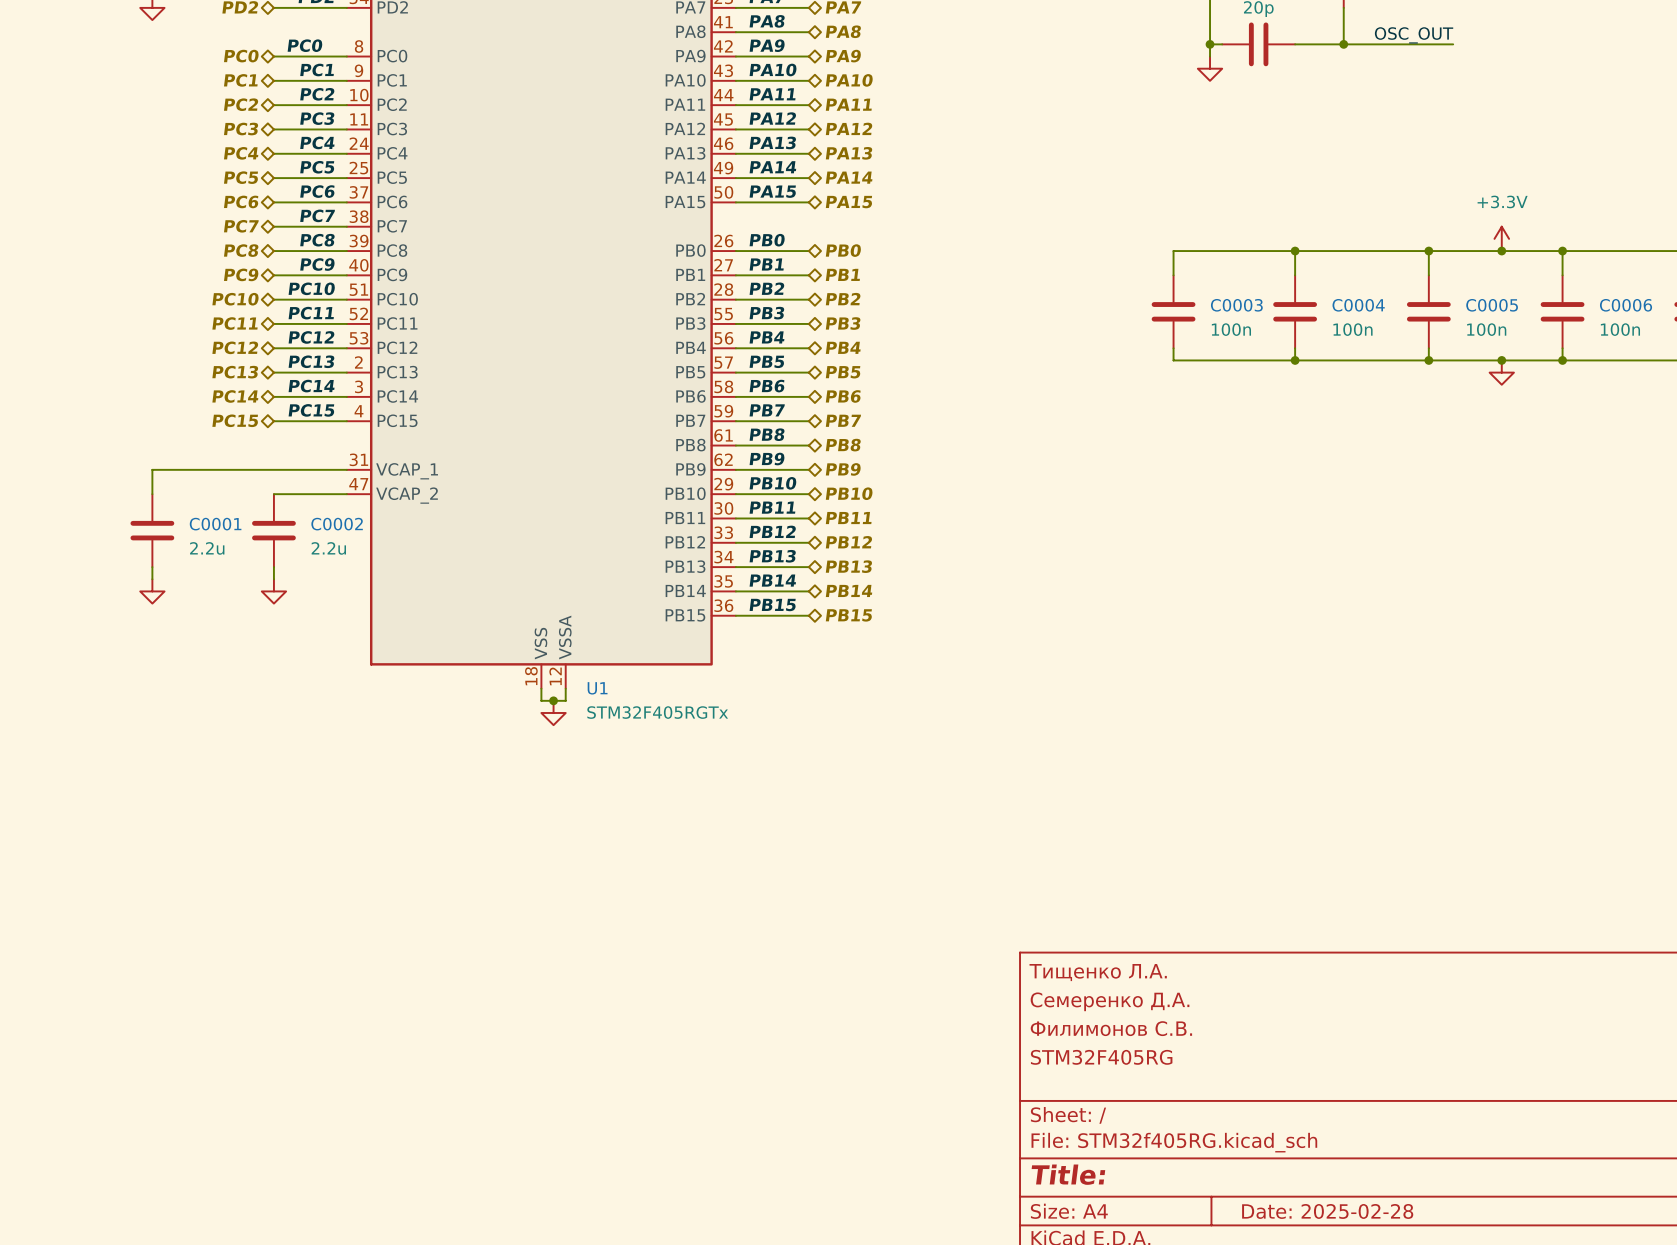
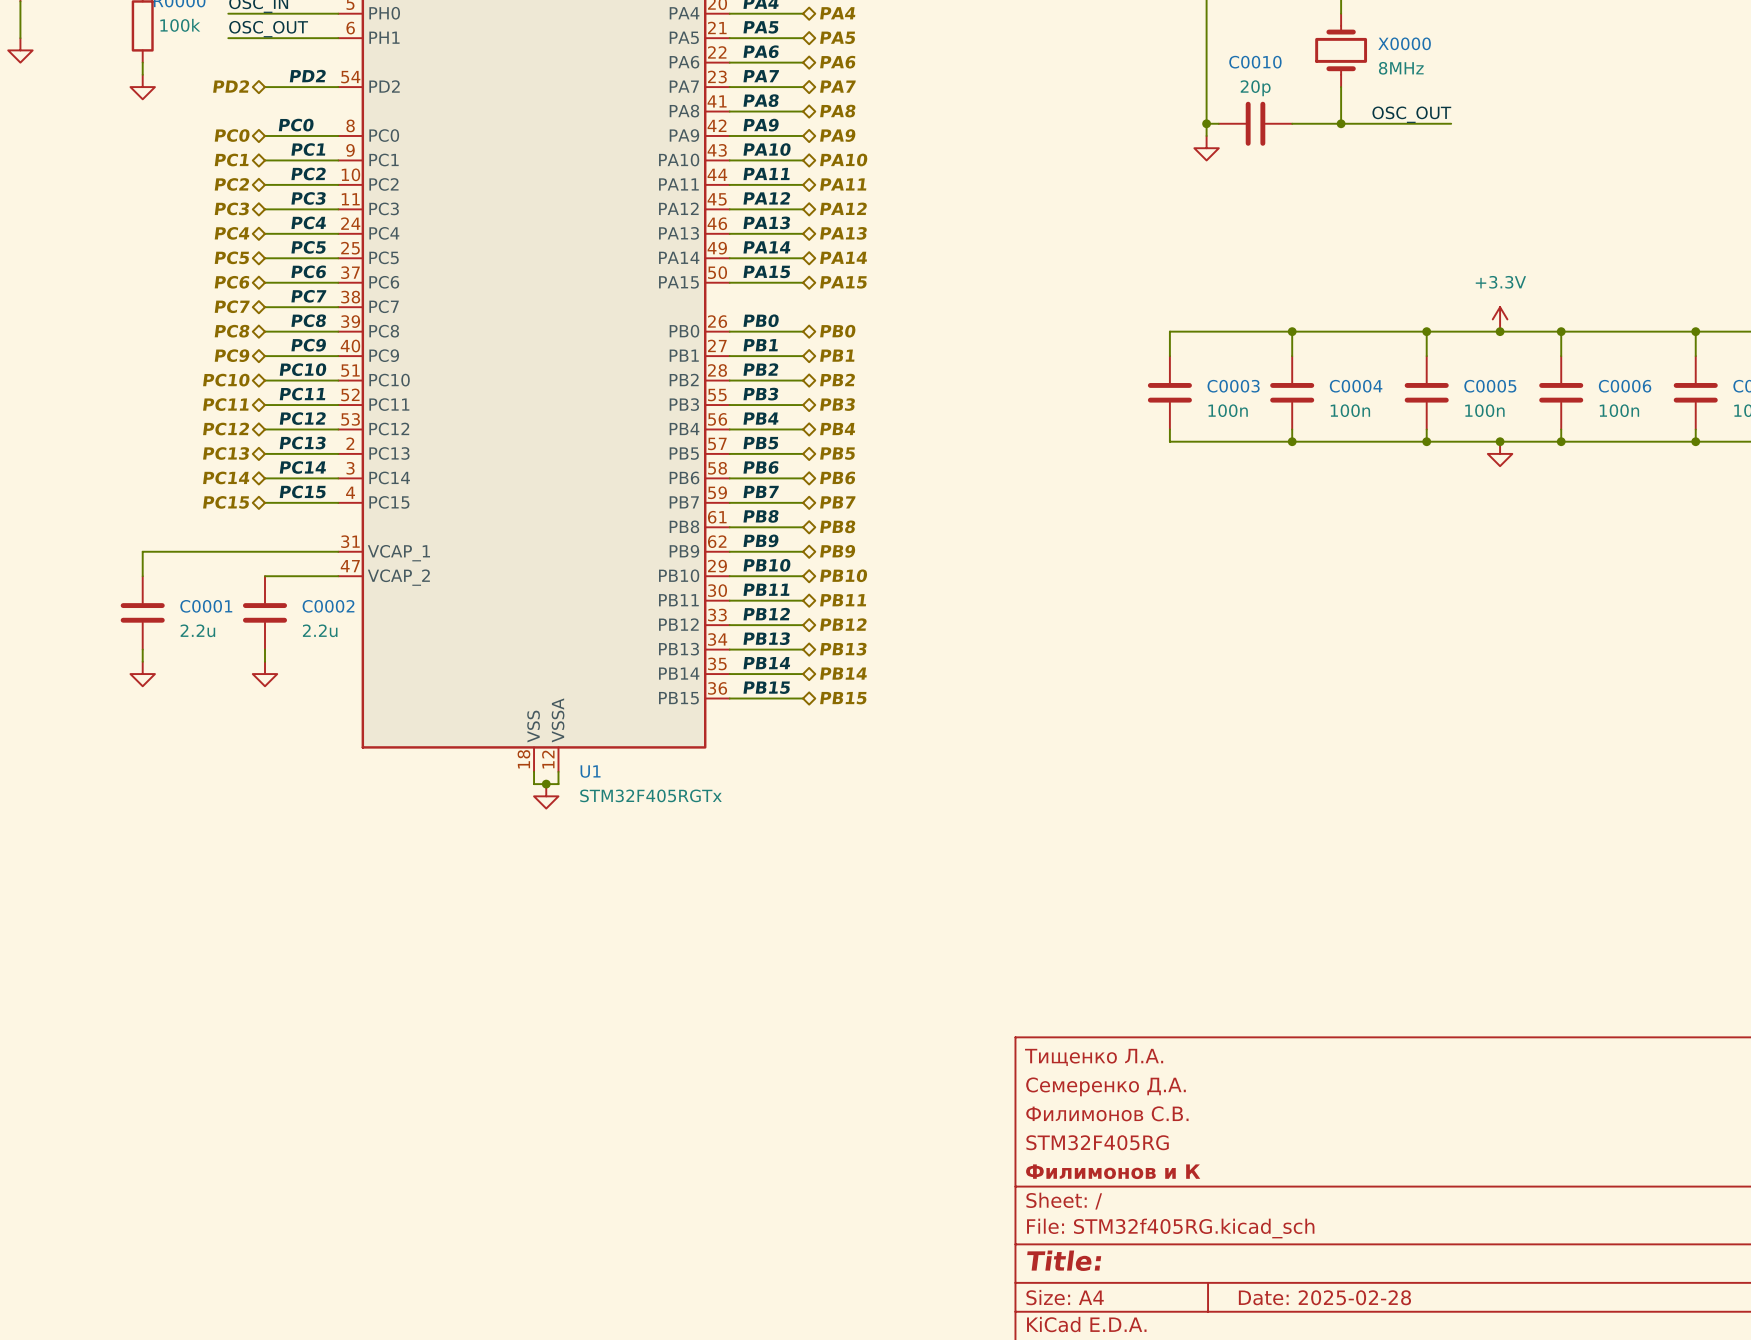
title block: none -> Филимонов и К (1113, 1171)

